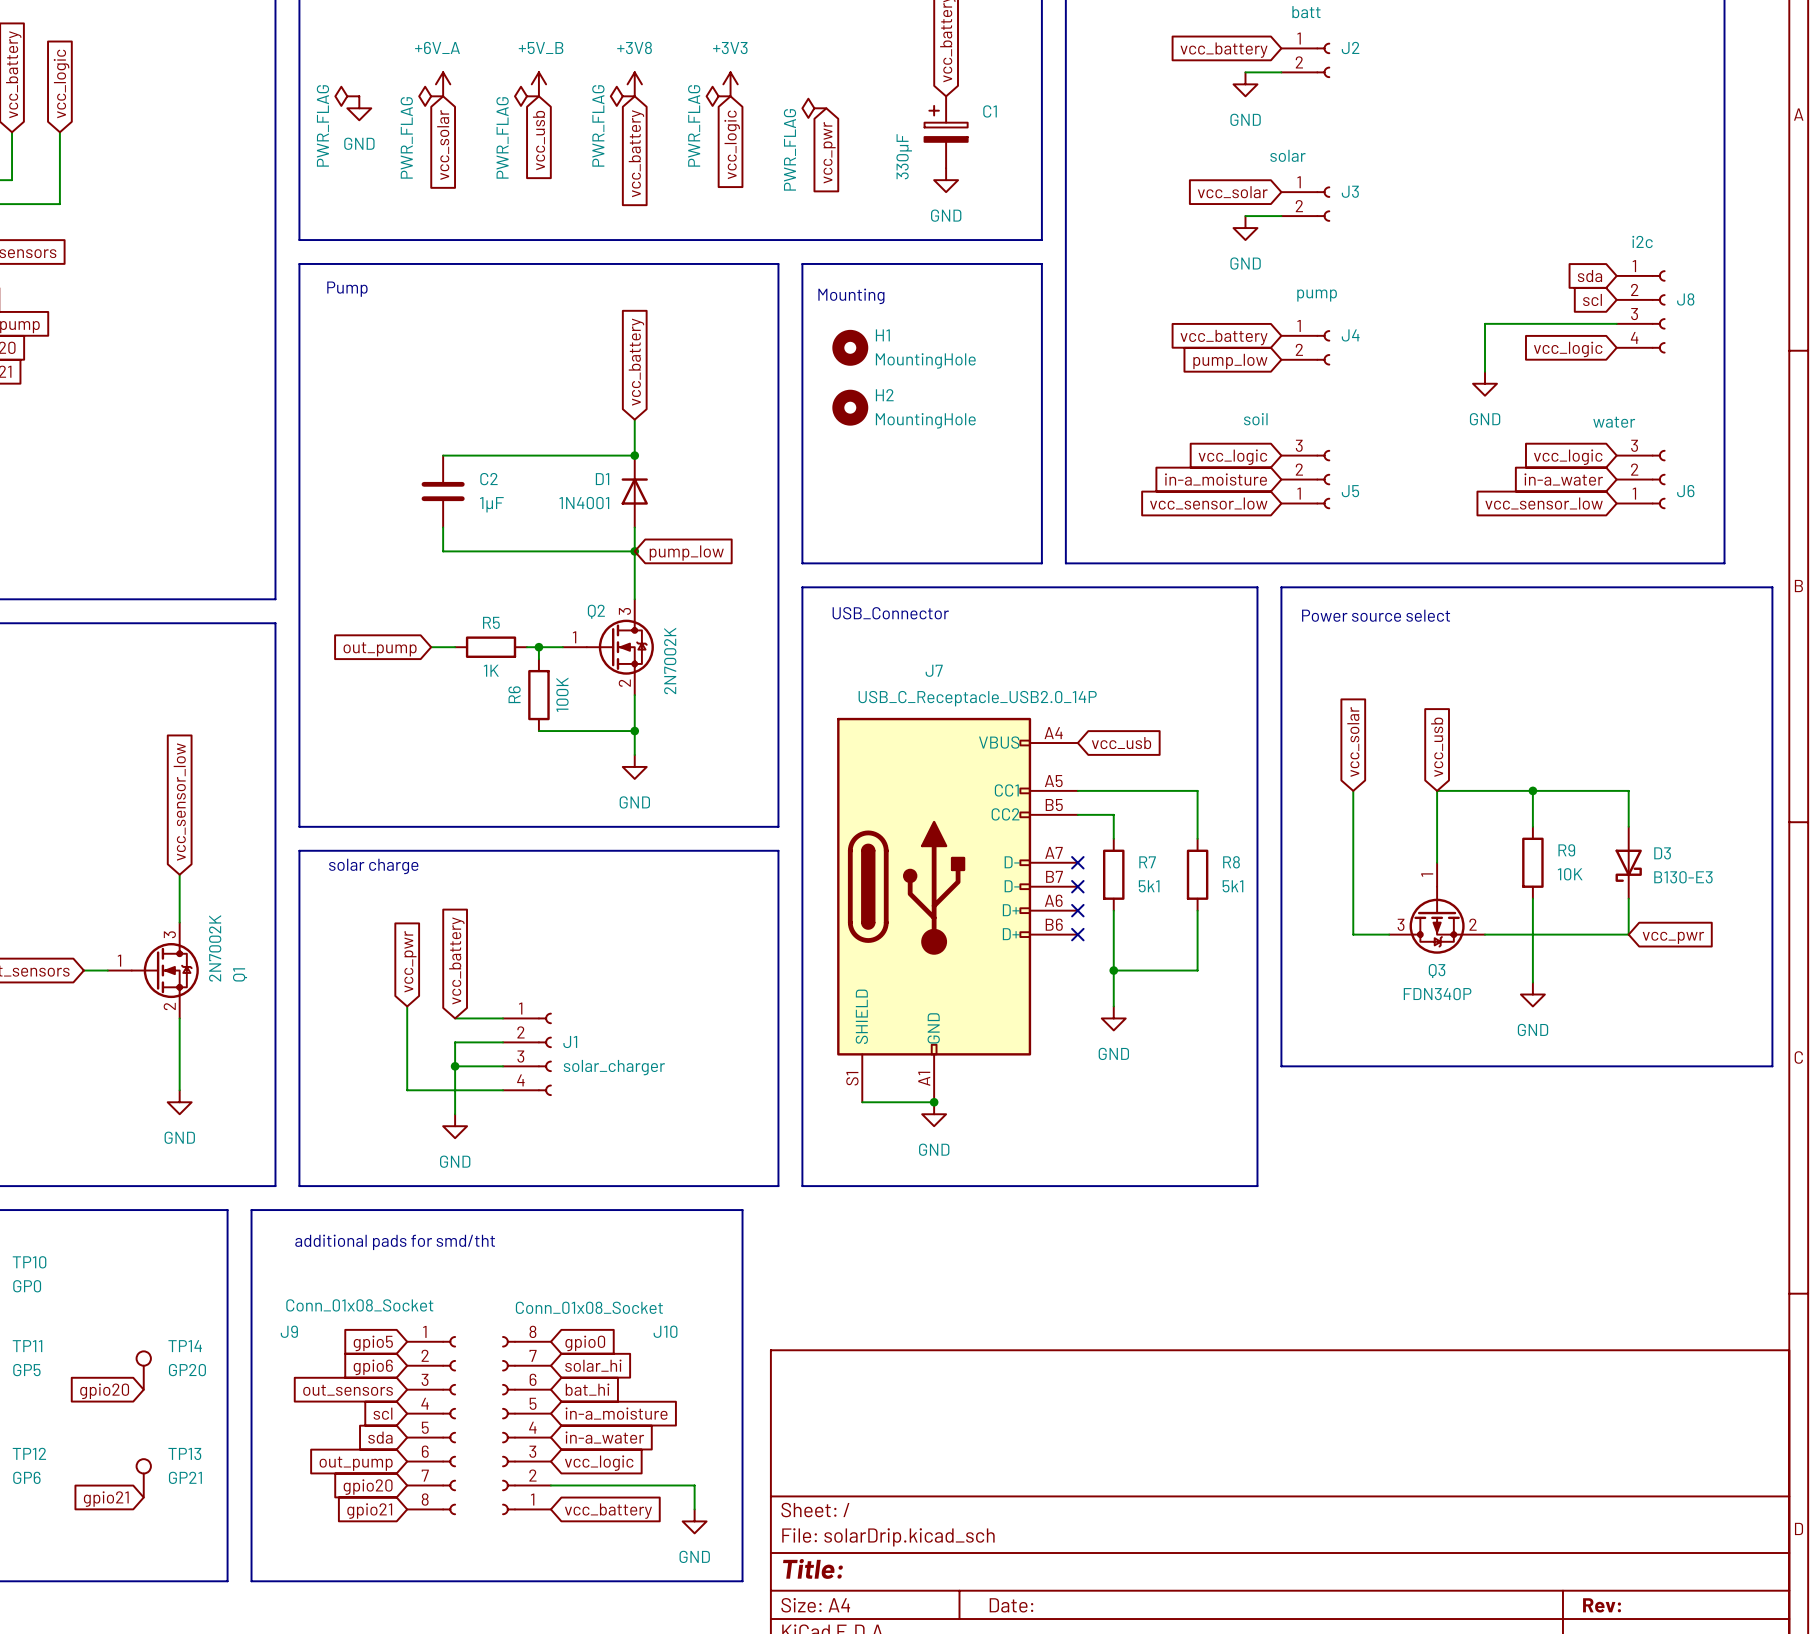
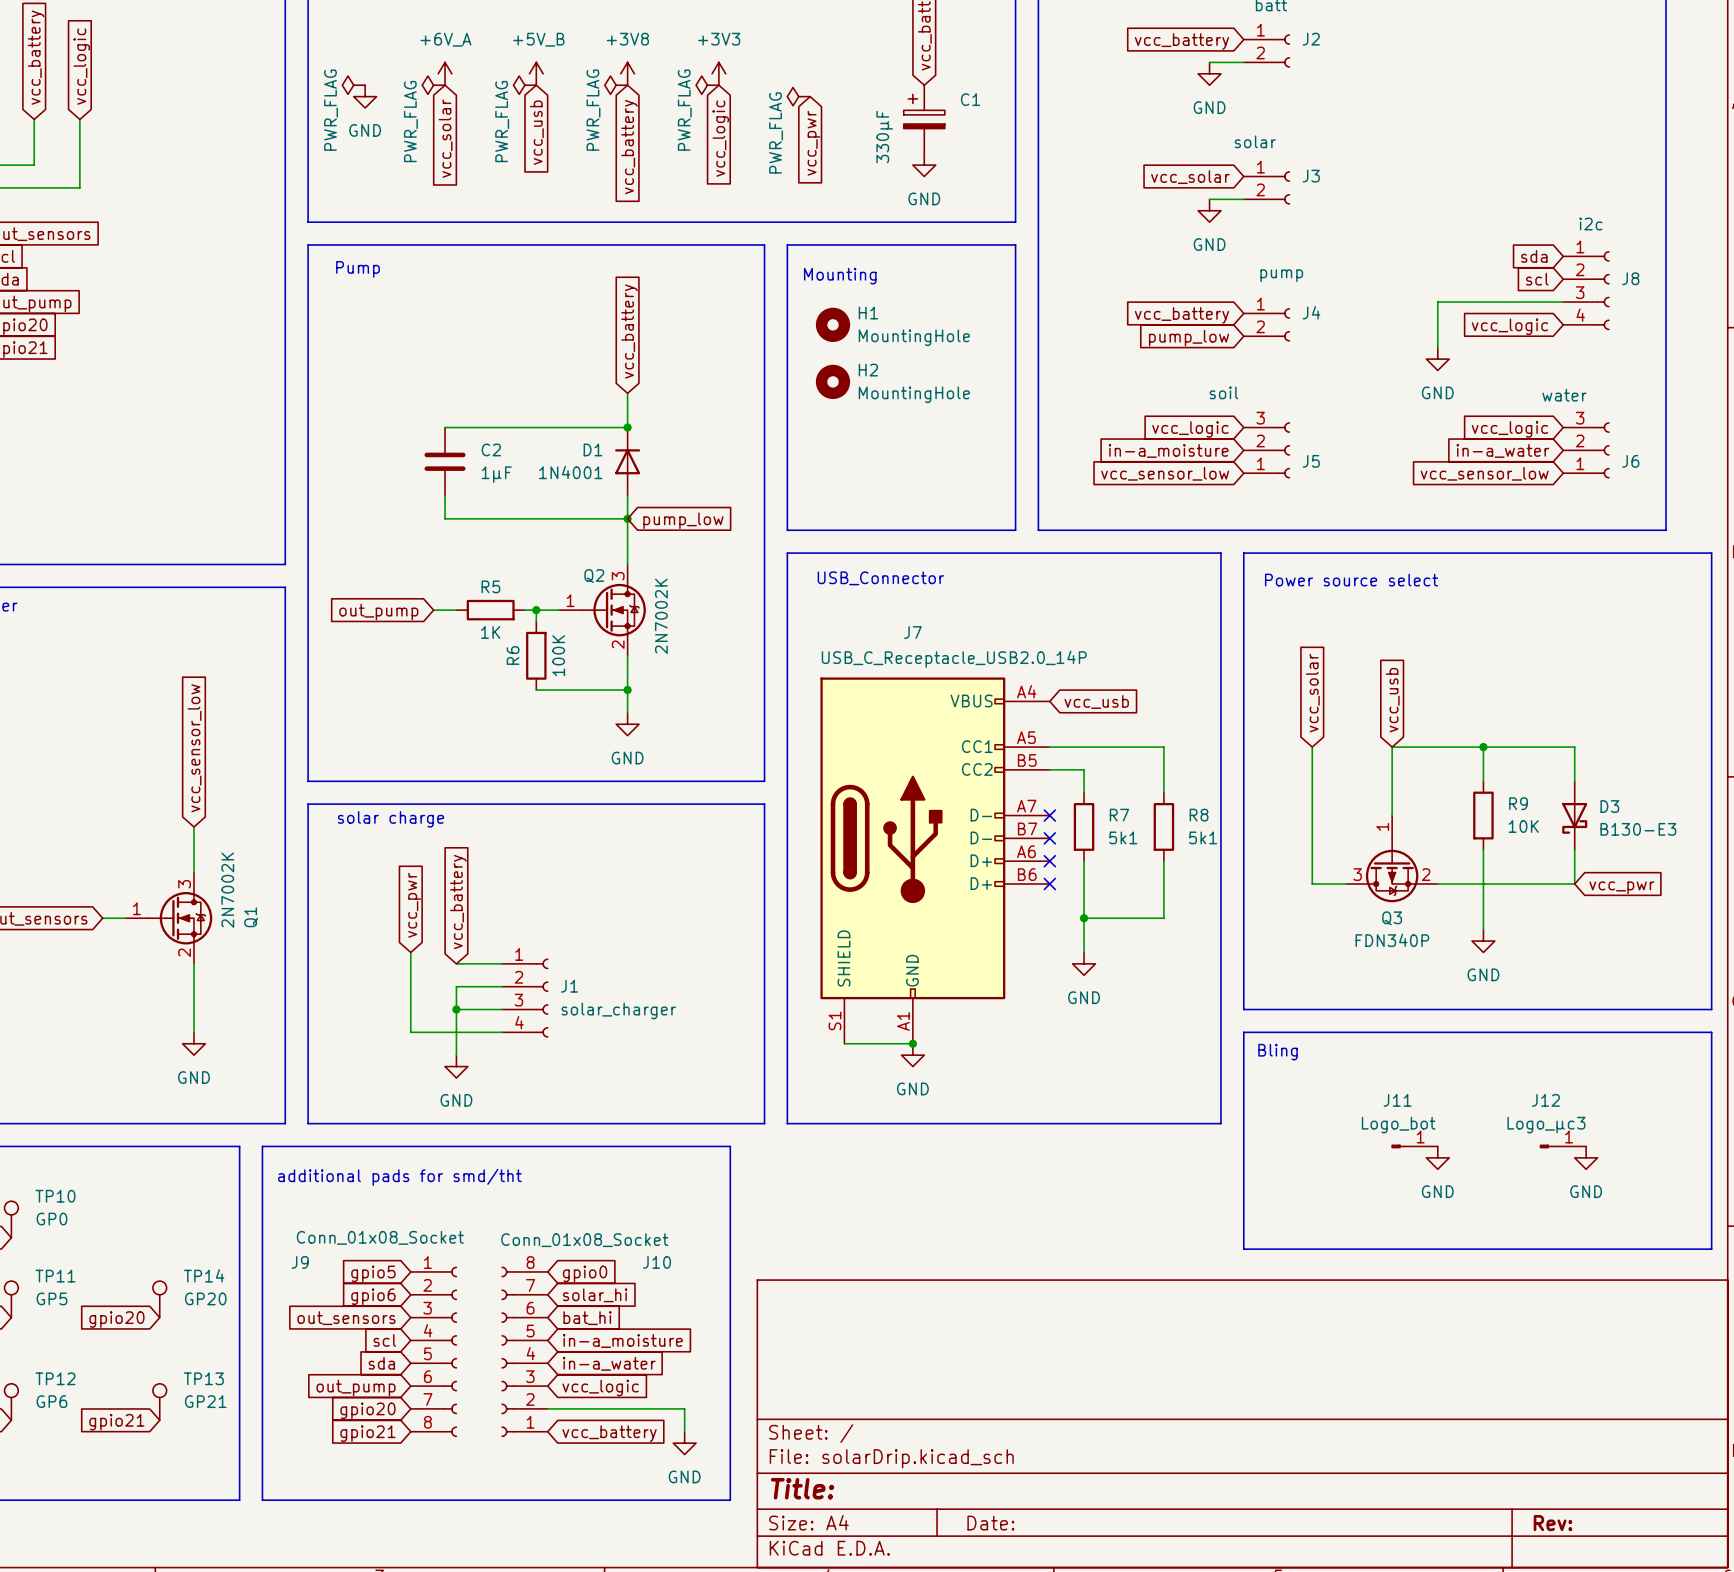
line: none -> (1243, 1032) (1711, 1032) (1711, 1249) (1243, 1249) (1243, 1032)
text: none -> Bling (1278, 1052)
J11: none -> Logo_bot (1414, 1146)
J12: none -> Logo_µc3 (1562, 1146)
power symbol: none -> GND (1437, 1157)
power symbol: none -> GND (1586, 1157)

